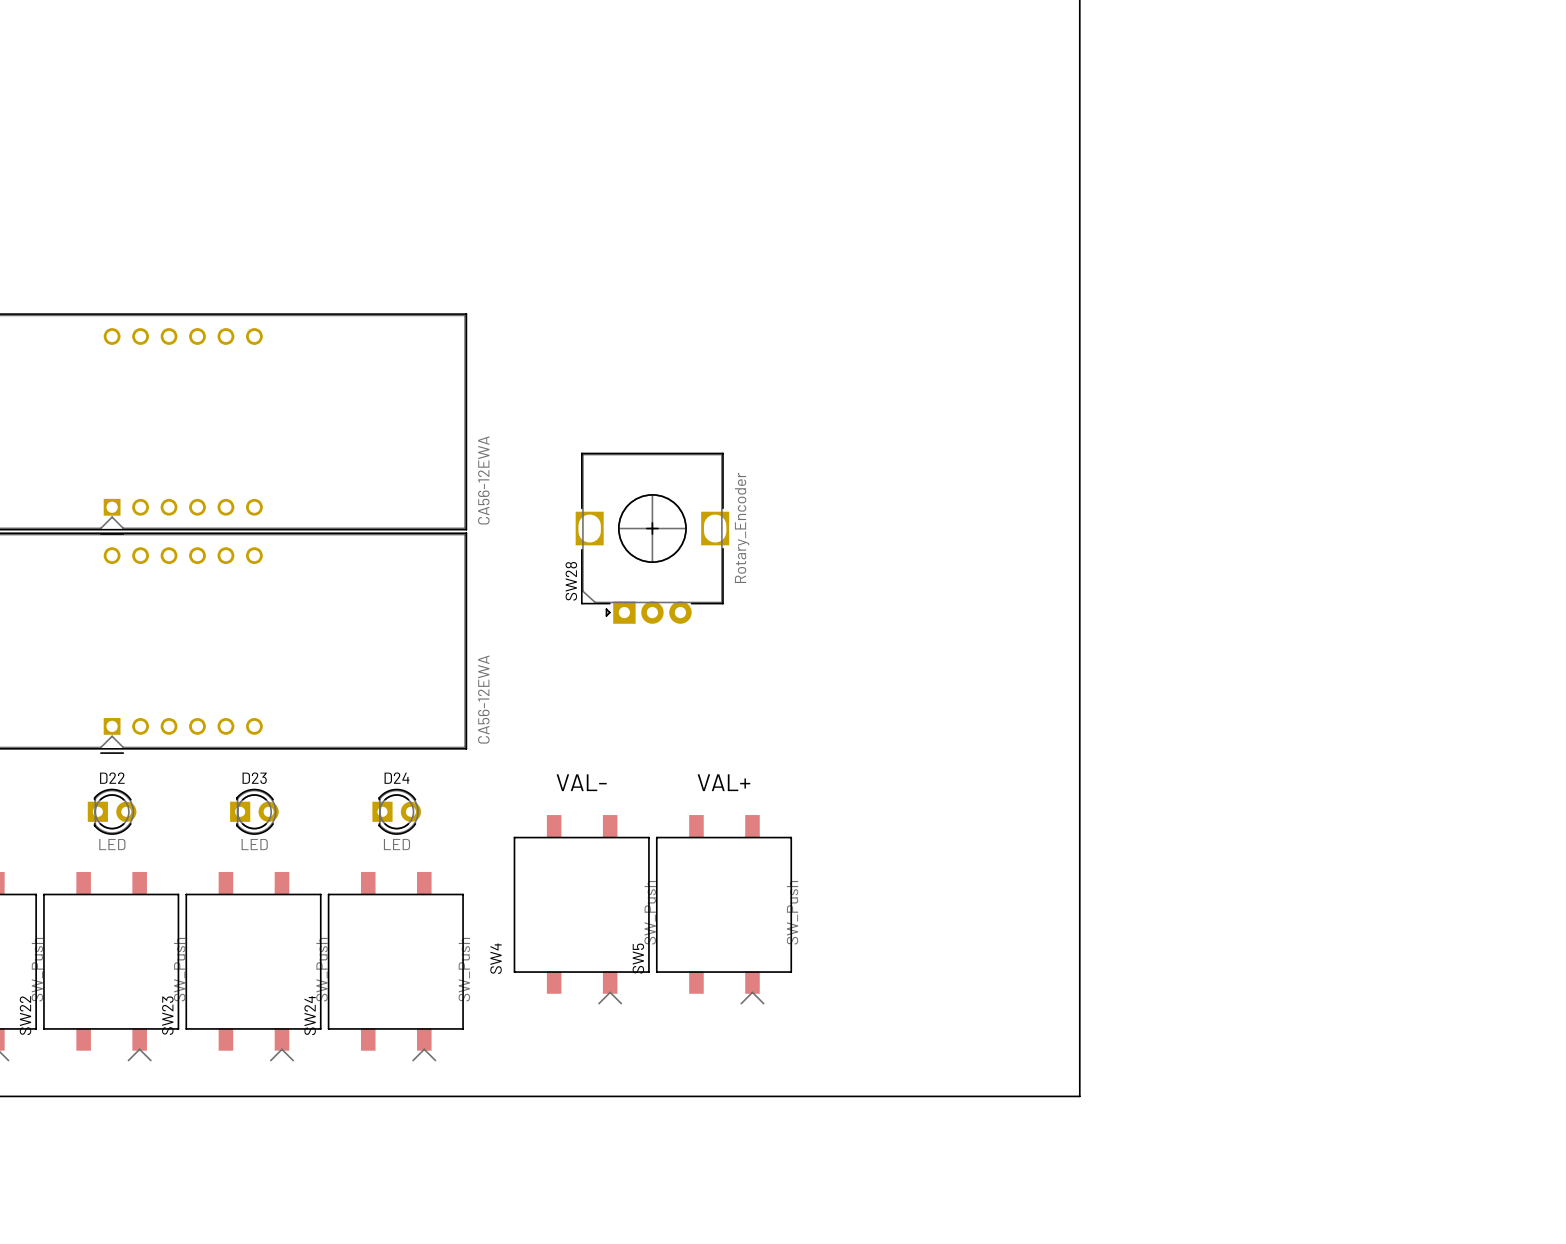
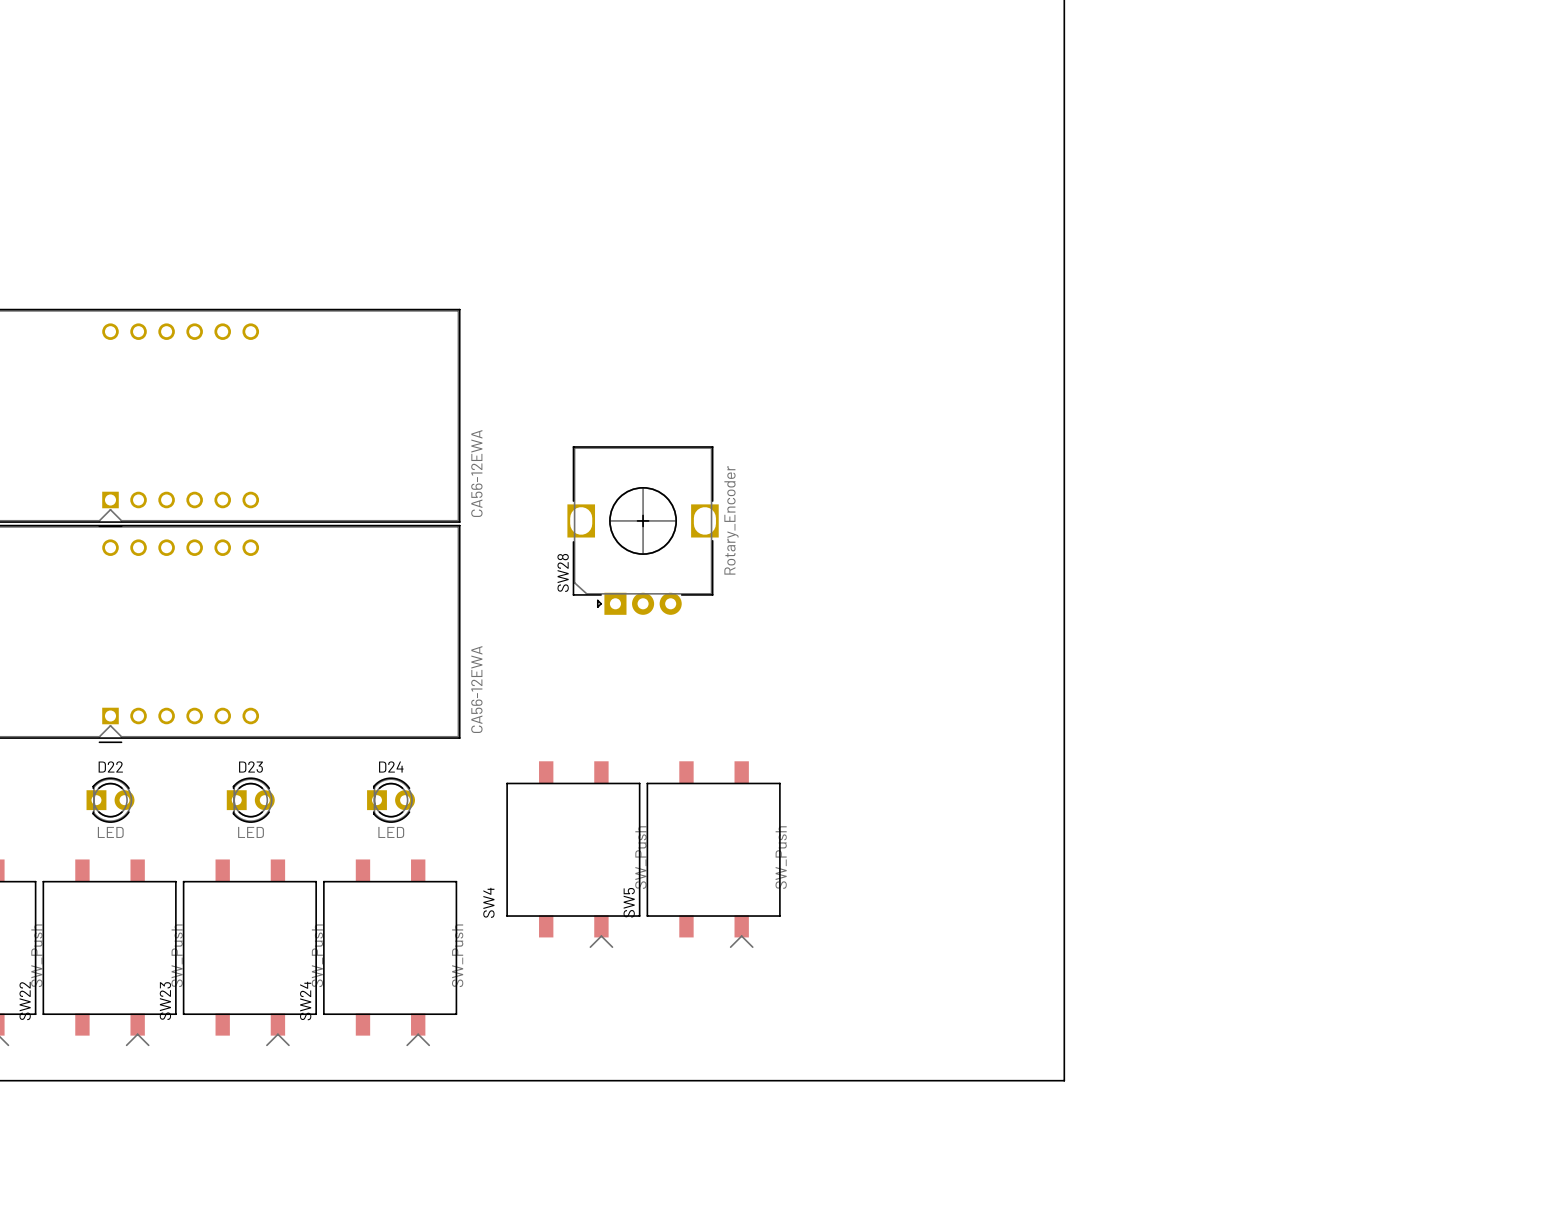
text: VAL- (581, 782) -> none
text: VAL+ (723, 782) -> none
SW4 position: (581, 909) -> (573, 854)
SW5 position: (724, 909) -> (713, 854)

